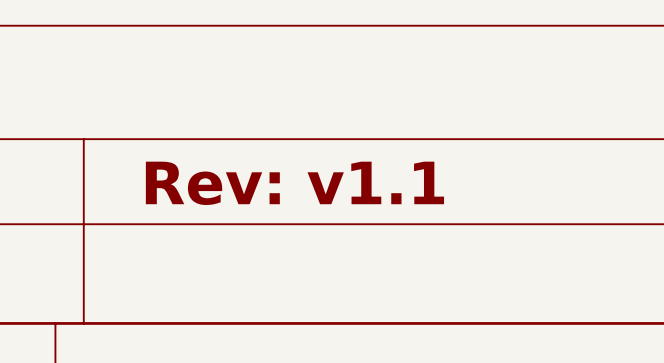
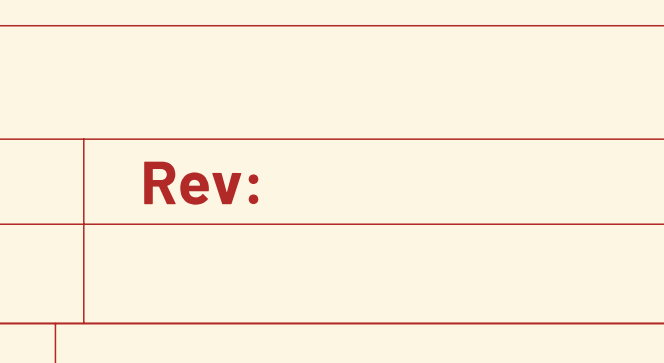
title block: Rev: v1.1 (294, 183) -> Rev: (201, 183)

